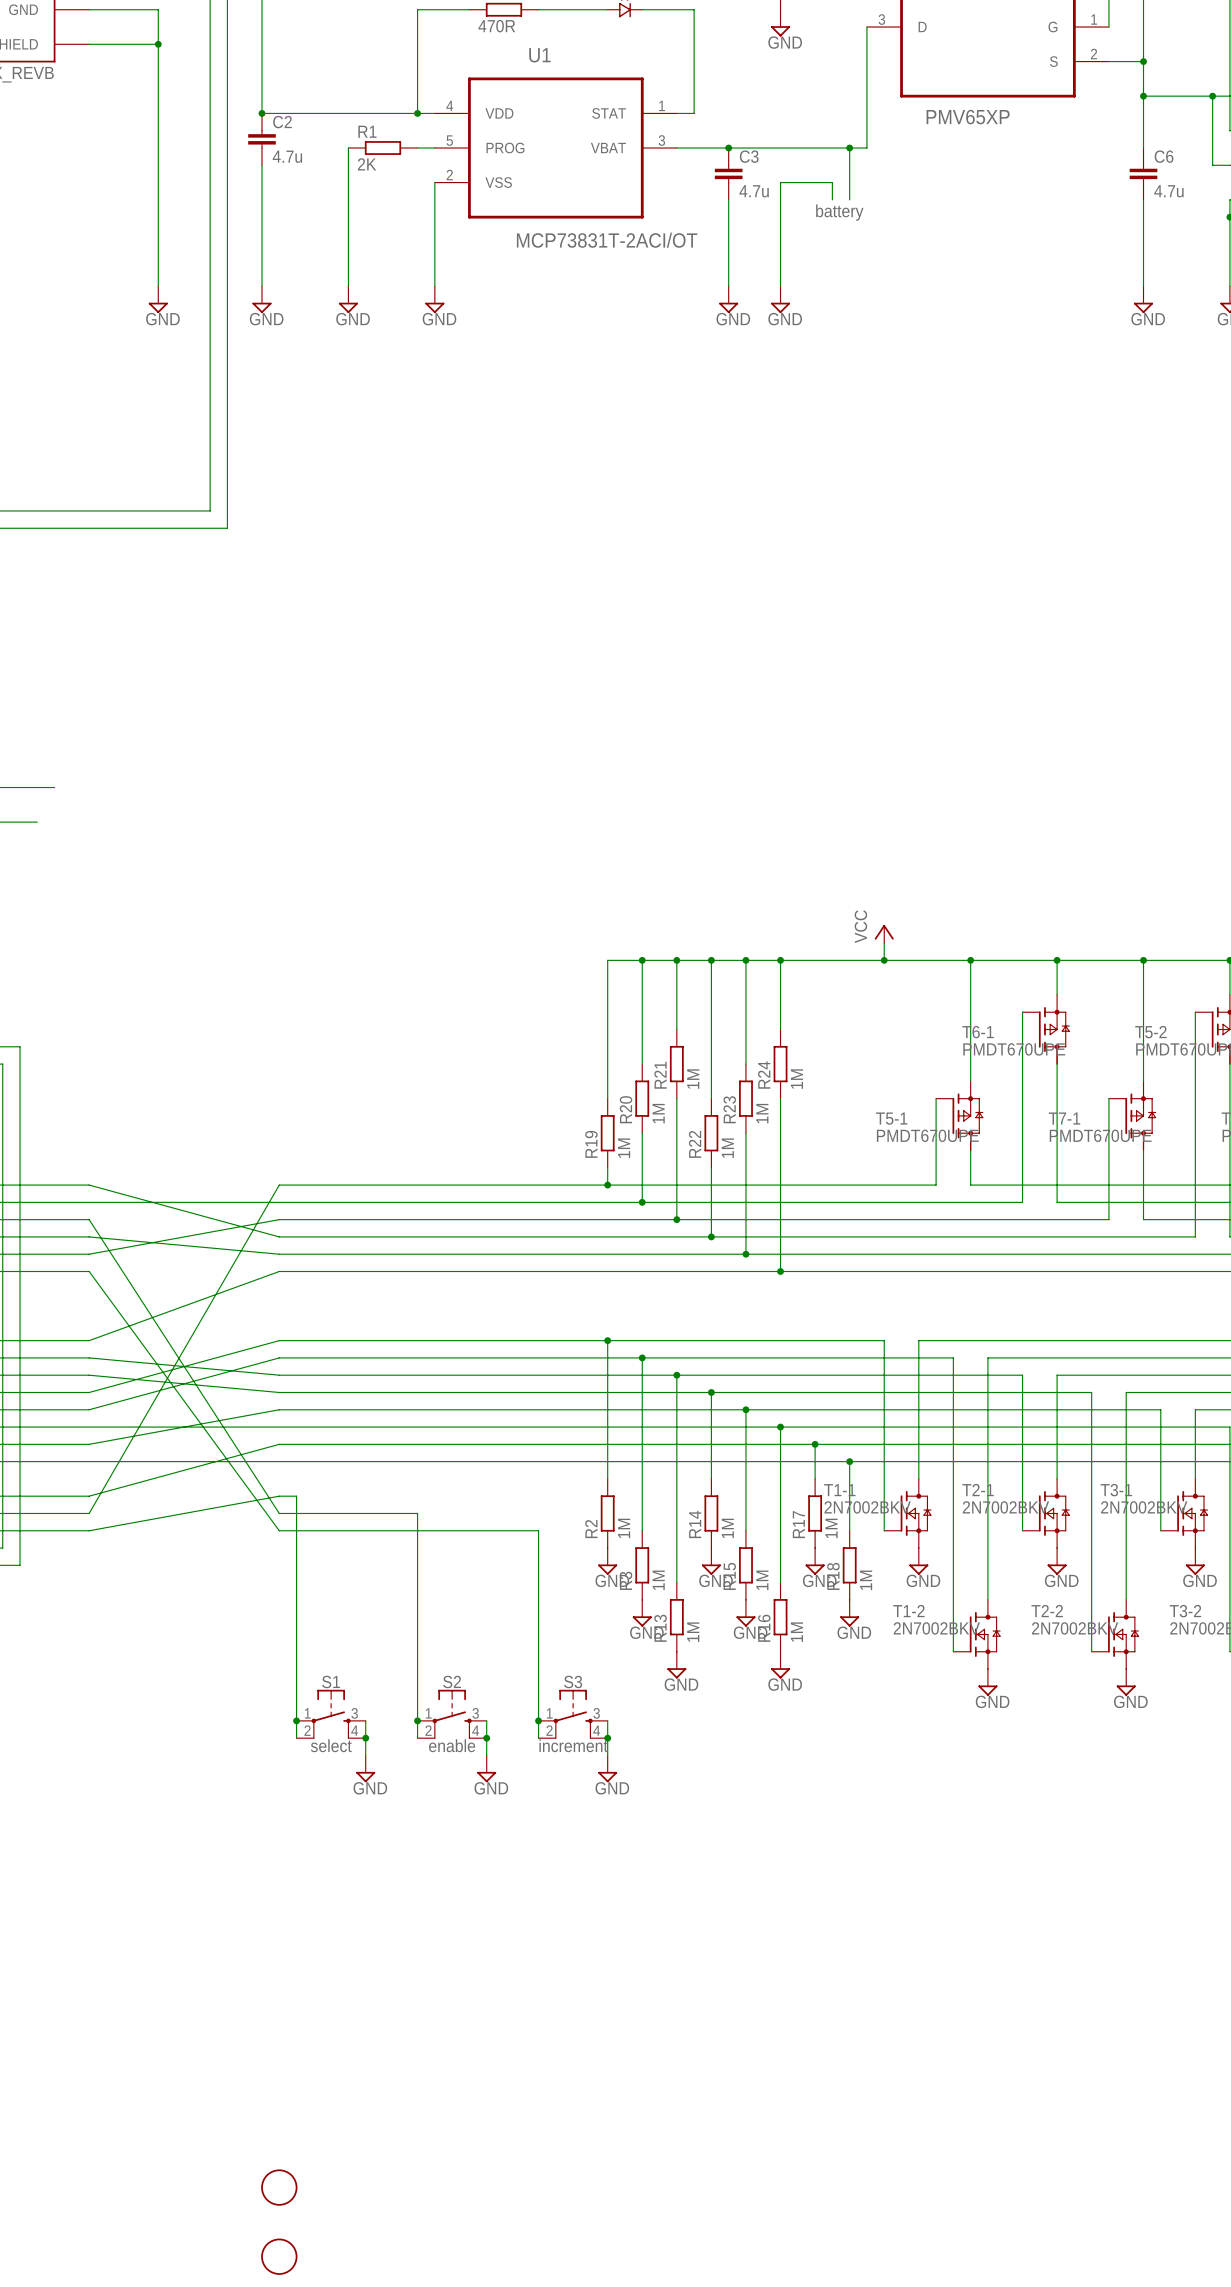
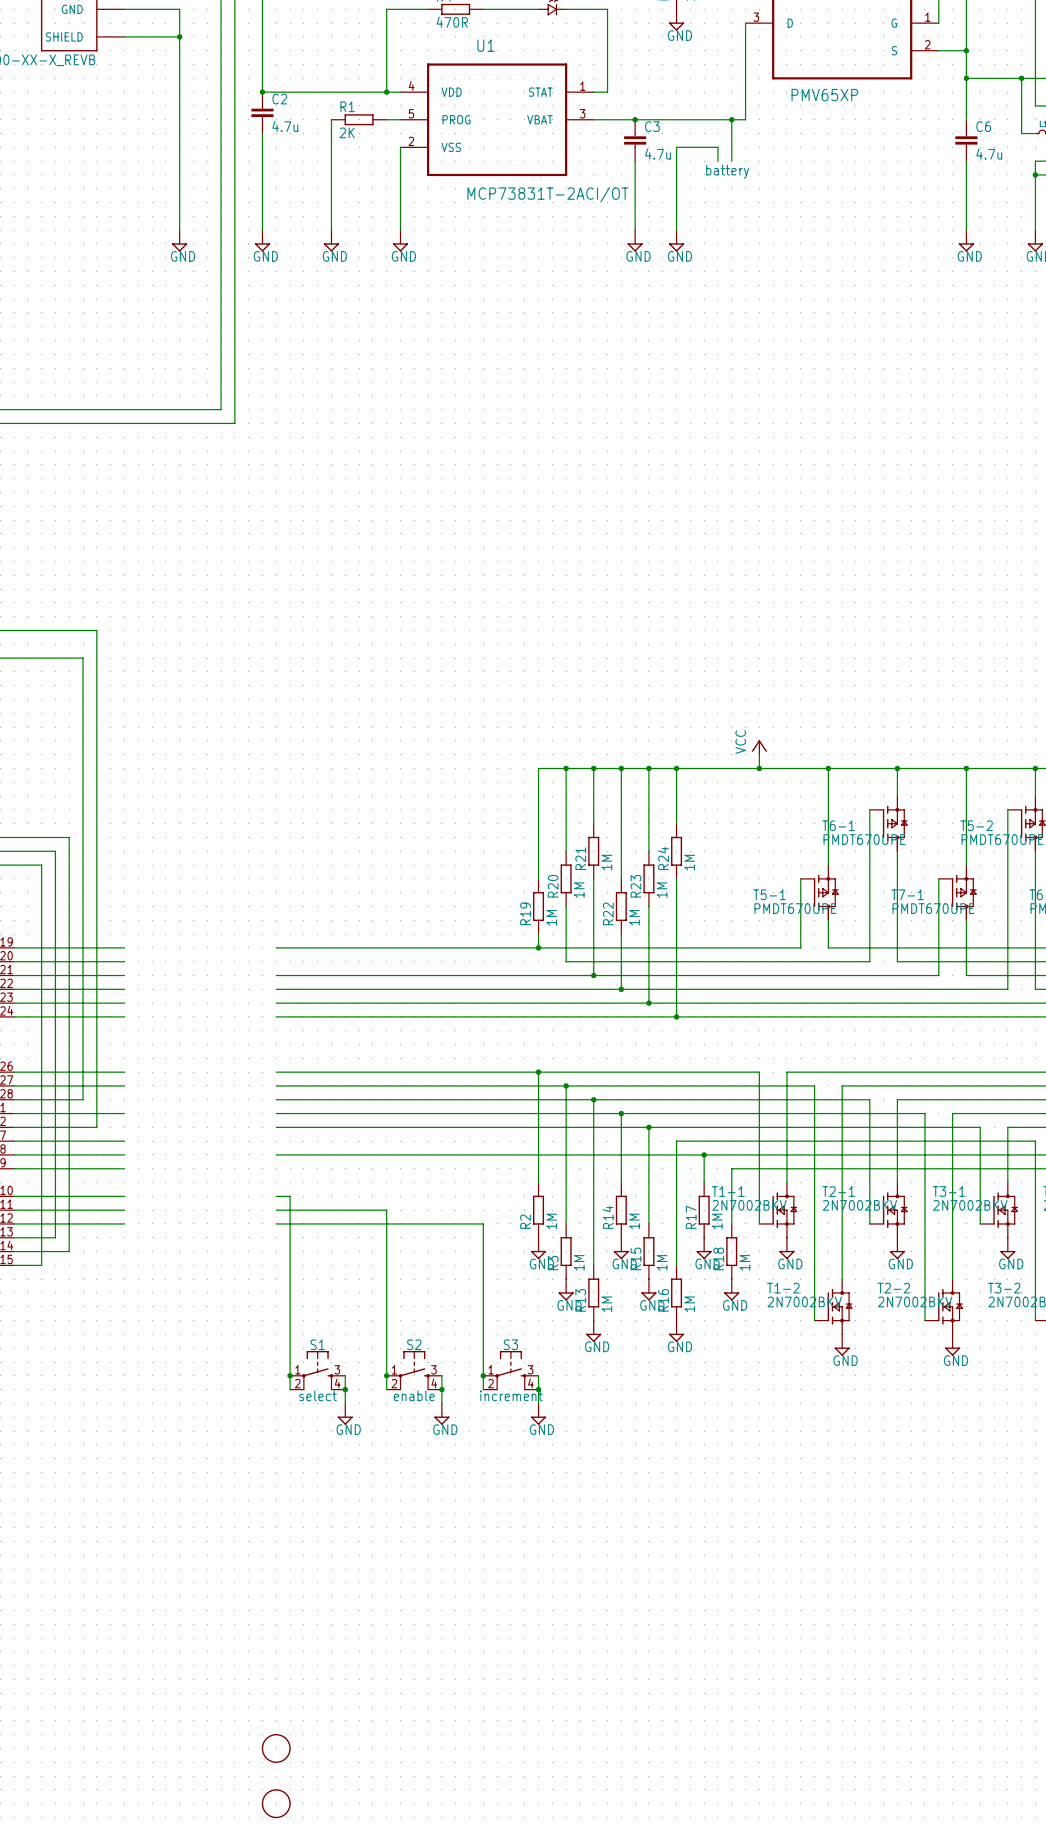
wire: (89, 1185) (279, 1236) -> none
wire: (279, 1185) (89, 1513) -> none
wire: (89, 1202) (642, 1202) -> none
junction: (642, 1202) -> none
wire: (89, 1219) (279, 1513) -> none
wire: (279, 1219) (89, 1254) -> none
wire: (89, 1236) (279, 1254) -> none
wire: (89, 1271) (279, 1530) -> none
wire: (279, 1271) (89, 1340) -> none
wire: (279, 1340) (89, 1392) -> none
wire: (89, 1357) (279, 1375) -> none
wire: (279, 1357) (89, 1409) (54, 1409) -> (96, 630) (96, 1127)
wire: (37, 1375) (89, 1375) (279, 1392) -> (83, 1099) (83, 658)
wire: (279, 1409) (89, 1444) -> none
wire: (89, 1427) (780, 1427) -> none
junction: (780, 1427) -> none
wire: (279, 1444) (89, 1496) -> none
wire: (89, 1461) (849, 1461) -> none
junction: (849, 1461) -> none
wire: (279, 1496) (89, 1530) -> none

